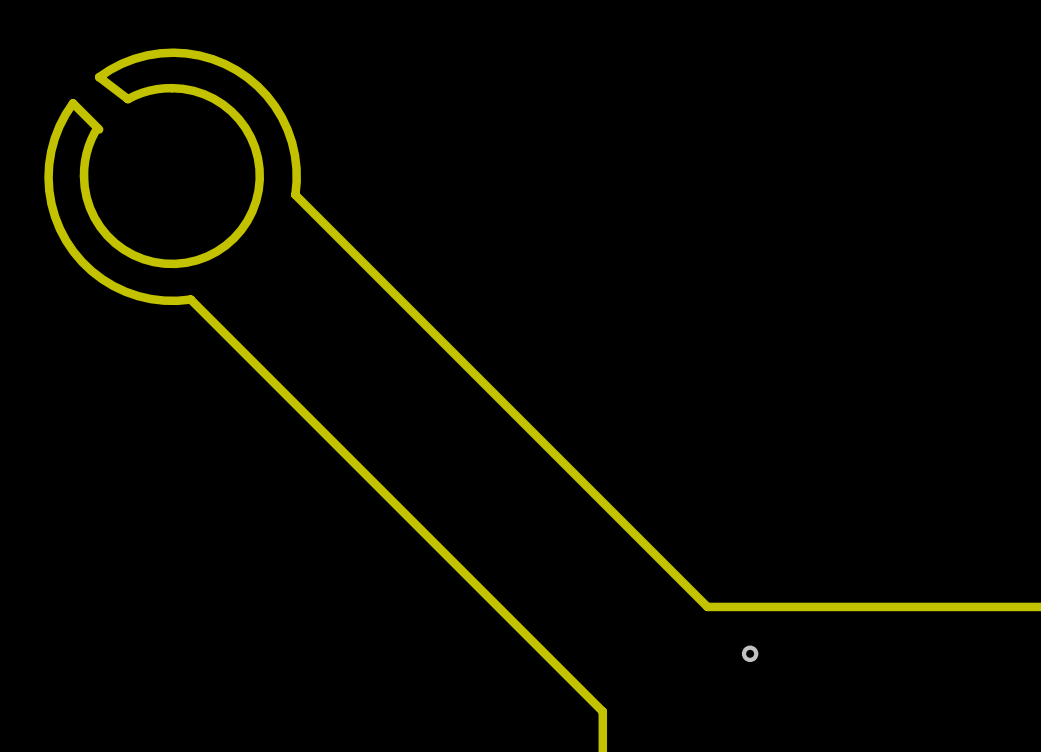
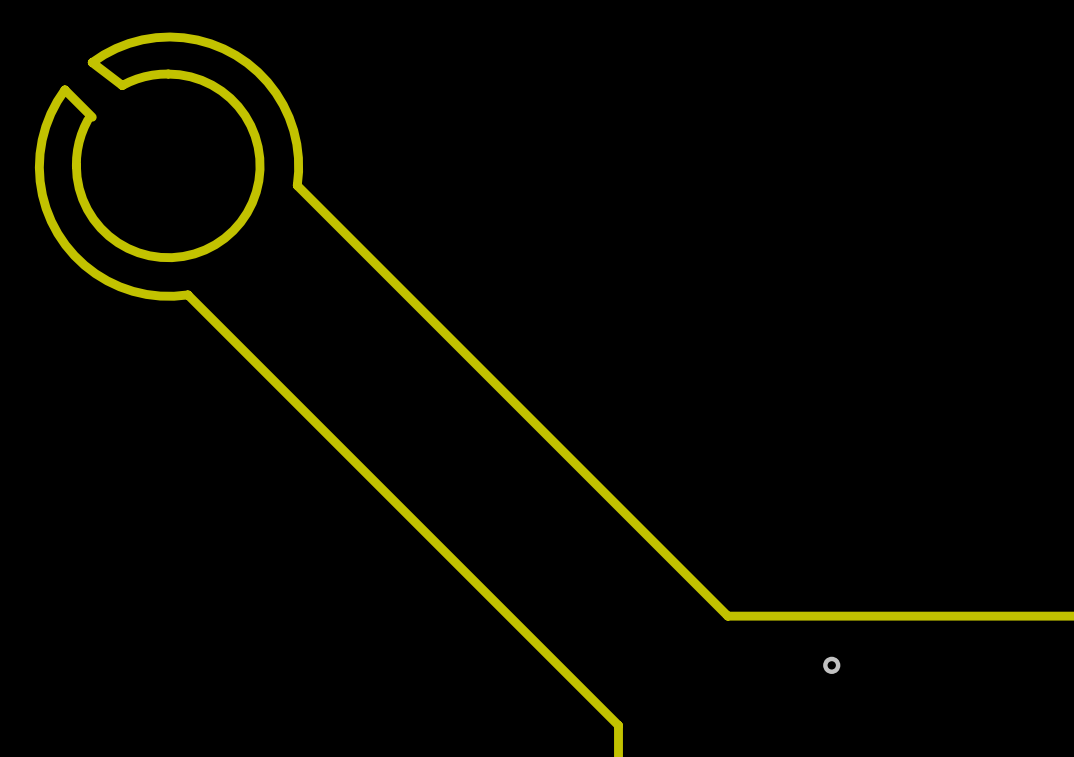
via position: (750, 653) -> (831, 665)

